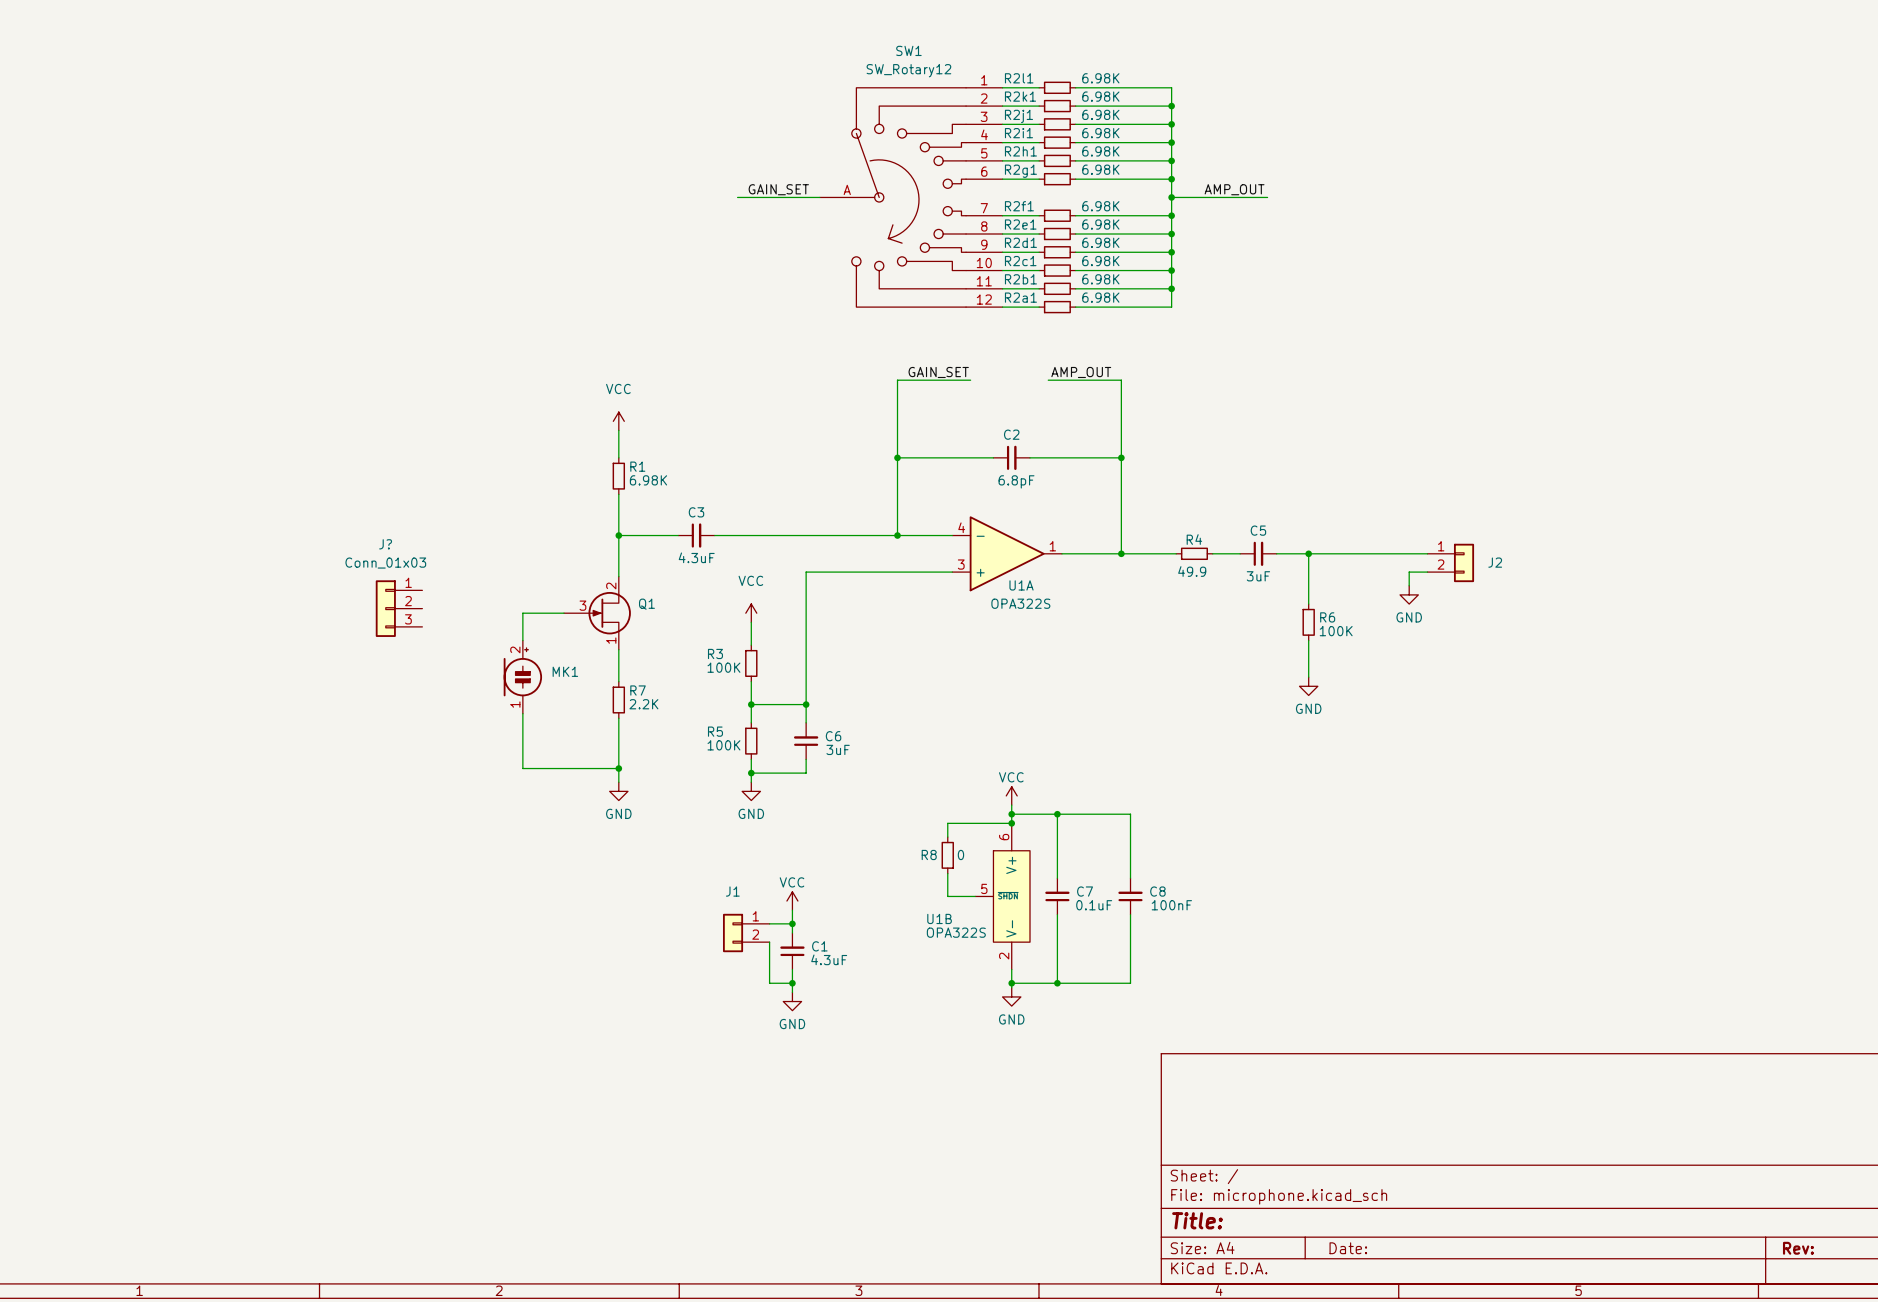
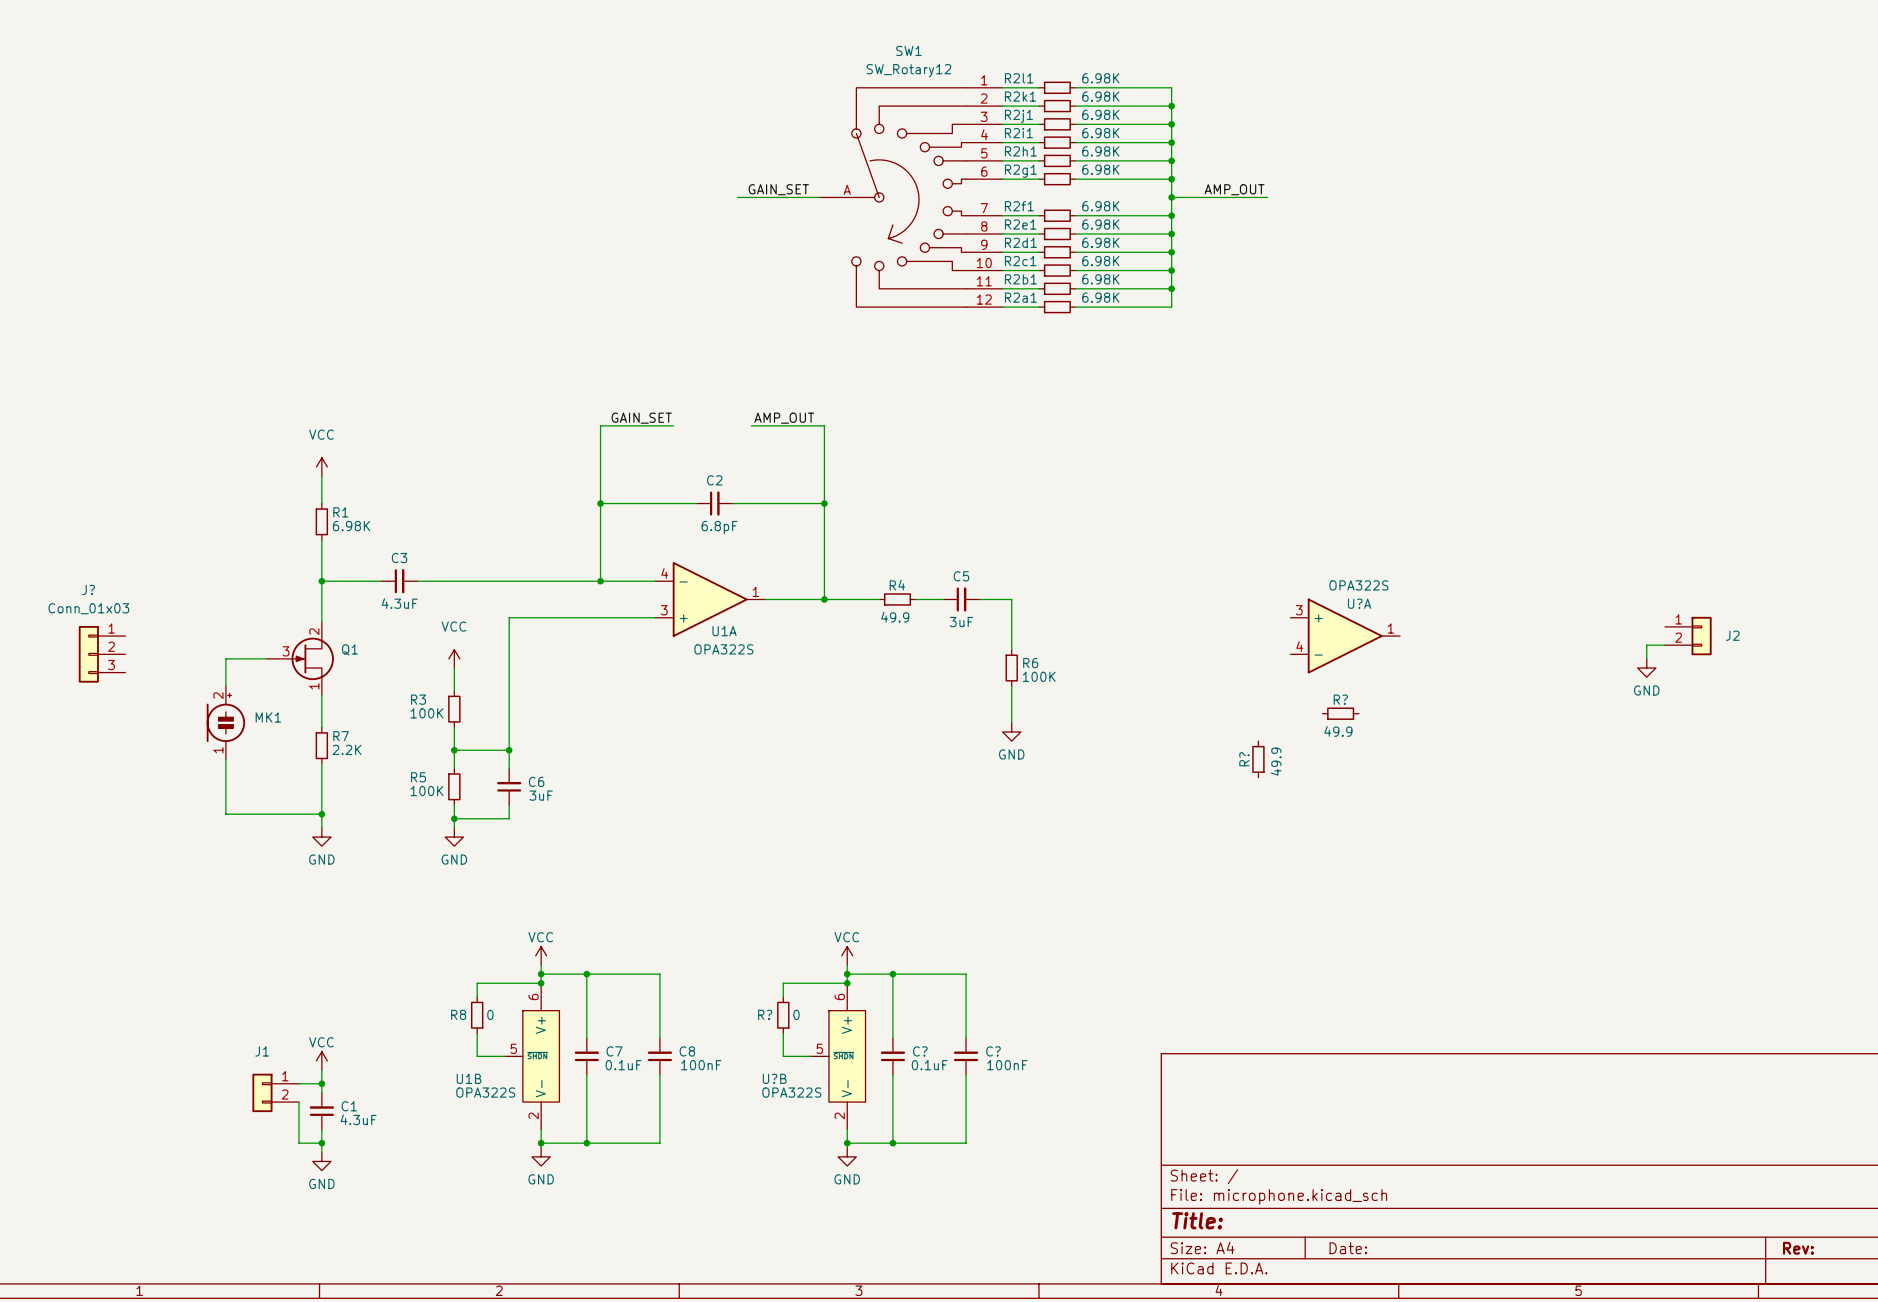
label: GAIN_SET (938, 372) -> none
label: AMP_OUT (1081, 372) -> none
wire: (970, 380) (897, 380) (897, 535) -> none
wire: (1048, 380) (1121, 380) (1121, 553) -> none
label: none -> GAIN_SET (641, 418)
label: none -> AMP_OUT (784, 418)
power symbol: VCC (618, 421) -> none
wire: none -> (673, 425) (600, 425) (600, 581)
wire: none -> (751, 425) (824, 425) (824, 599)
wire: (618, 430) (618, 457) -> none
wire: (897, 457) (993, 457) -> none
junction: (897, 457) -> none
C2 position: (1011, 457) -> (714, 503)
wire: (1029, 457) (1121, 457) -> none
junction: (1121, 457) -> none
power symbol: none -> VCC (321, 467)
wire: none -> (321, 476) (321, 503)
R1 position: (618, 476) -> (321, 521)
wire: (618, 494) (618, 576) -> none
wire: none -> (600, 503) (696, 503)
junction: none -> (600, 503)
wire: none -> (733, 503) (824, 503)
junction: none -> (824, 503)
wire: (618, 535) (678, 535) -> none
junction: (618, 535) -> none
C3 position: (696, 535) -> (399, 581)
wire: (714, 535) (952, 535) -> none
junction: (897, 535) -> none
wire: none -> (321, 540) (321, 622)
U1A position: (1007, 553) -> (710, 599)
wire: (1061, 553) (1176, 553) -> none
junction: (1121, 553) -> none
R4 position: (1194, 553) -> (897, 599)
wire: (1212, 553) (1240, 553) -> none
C5 position: (1258, 553) -> (961, 599)
wire: (1276, 553) (1427, 553) -> none
wire: (1308, 553) (1308, 604) -> none
junction: (1308, 553) -> none
J2 position: (1450, 562) -> (1688, 636)
wire: (952, 572) (806, 572) (806, 704) -> none
wire: (1427, 572) (1409, 572) (1409, 585) -> none
wire: none -> (321, 581) (381, 581)
junction: none -> (321, 581)
wire: none -> (417, 581) (655, 581)
junction: none -> (600, 581)
power symbol: GND (1409, 594) -> none
wire: none -> (765, 599) (879, 599)
junction: none -> (824, 599)
wire: none -> (915, 599) (943, 599)
wire: none -> (979, 599) (1011, 599) (1011, 649)
J?: Conn_01x03 (399, 608) -> none
wire: (563, 613) (522, 613) (522, 640) -> none
Q1 position: (597, 613) -> (300, 658)
power symbol: VCC (751, 613) -> none
wire: none -> (655, 617) (509, 617) (509, 768)
wire: (751, 622) (751, 645) -> none
R6 position: (1308, 622) -> (1011, 668)
U?A: none -> OPA322S (1345, 636)
wire: none -> (1665, 645) (1646, 645) (1646, 658)
wire: (618, 649) (618, 681) -> none
J?: none -> Conn_01x03 (102, 654)
wire: none -> (267, 658) (225, 658) (225, 686)
power symbol: none -> VCC (454, 658)
R3 position: (751, 663) -> (454, 709)
wire: none -> (454, 668) (454, 690)
power symbol: none -> GND (1646, 668)
MK1 position: (522, 677) -> (225, 722)
wire: (751, 681) (751, 704) -> none
wire: none -> (1011, 686) (1011, 722)
power symbol: GND (1308, 686) -> none
wire: none -> (321, 695) (321, 727)
R7 position: (618, 700) -> (321, 745)
wire: (751, 704) (751, 722) -> none
wire: (751, 704) (806, 704) -> none
junction: (751, 704) -> none
wire: (806, 704) (806, 722) -> none
junction: (806, 704) -> none
wire: (522, 713) (522, 768) (618, 768) -> none
R?: none -> 49.9 (1340, 713)
wire: (618, 718) (618, 782) -> none
wire: none -> (454, 727) (454, 768)
power symbol: none -> GND (1011, 731)
R5 position: (751, 741) -> (454, 786)
C6 position: (806, 741) -> (509, 786)
wire: none -> (454, 750) (509, 750)
junction: none -> (454, 750)
junction: none -> (509, 750)
wire: none -> (225, 759) (225, 814) (321, 814)
wire: (751, 759) (751, 782) -> none
wire: (806, 759) (806, 773) (751, 773) -> none
R?: none -> 49.9 (1258, 759)
wire: none -> (321, 763) (321, 827)
junction: (618, 768) -> none
junction: (751, 773) -> none
power symbol: GND (618, 791) -> none
power symbol: GND (751, 791) -> none
power symbol: VCC (1011, 795) -> none
wire: none -> (454, 805) (454, 827)
wire: none -> (509, 805) (509, 818) (454, 818)
wire: (1011, 805) (1011, 823) (947, 823) (947, 837) -> none
junction: none -> (321, 814)
wire: (1011, 814) (1130, 814) (1130, 878) -> none
junction: (1011, 814) -> none
wire: (1057, 814) (1057, 878) -> none
junction: (1057, 814) -> none
junction: none -> (454, 818)
junction: (1011, 823) -> none
power symbol: none -> GND (321, 837)
power symbol: none -> GND (454, 837)
R8 position: (947, 855) -> (477, 1015)
wire: (947, 873) (947, 896) (975, 896) -> none
U1B position: (1002, 896) -> (532, 1056)
C7 position: (1057, 896) -> (586, 1056)
C8 position: (1130, 896) -> (659, 1056)
power symbol position: VCC (792, 901) -> VCC (847, 955)
wire: (792, 910) (792, 933) -> none
wire: (1057, 914) (1057, 983) -> none
wire: (1130, 914) (1130, 983) (1011, 983) -> none
wire: (769, 923) (792, 923) -> none
junction: (792, 923) -> none
J1 position: (746, 933) -> (275, 1092)
wire: (769, 942) (769, 983) (783, 983) -> (783, 996) (783, 983)
C1 position: (792, 951) -> (321, 1111)
power symbol: none -> VCC (541, 955)
wire: none -> (541, 964) (541, 983) (477, 983) (477, 996)
wire: none -> (847, 964) (847, 983) (792, 983)
wire: (792, 969) (792, 992) -> none
wire: (1011, 969) (1011, 987) -> none
wire: none -> (541, 974) (659, 974) (659, 1038)
junction: none -> (541, 974)
wire: none -> (586, 974) (586, 1038)
junction: none -> (586, 974)
wire: none -> (847, 974) (966, 974) (966, 1038)
junction: none -> (847, 974)
wire: none -> (892, 974) (892, 1038)
junction: none -> (892, 974)
junction: none -> (541, 983)
junction: (792, 983) -> none
junction: none -> (847, 983)
junction: (1011, 983) -> none
junction: (1057, 983) -> none
power symbol: GND (1011, 996) -> none
power symbol: GND (792, 1001) -> none
R?: none -> 0 (783, 1015)
wire: none -> (477, 1033) (477, 1056) (504, 1056)
wire: none -> (783, 1033) (783, 1056) (810, 1056)
U?B: none -> OPA322S (838, 1056)
C?: none -> 0.1uF (892, 1056)
C?: none -> 100nF (966, 1056)
power symbol: none -> VCC (321, 1060)
wire: none -> (321, 1070) (321, 1092)
wire: none -> (586, 1074) (586, 1143)
wire: none -> (659, 1074) (659, 1143) (541, 1143)
wire: none -> (892, 1074) (892, 1143)
wire: none -> (966, 1074) (966, 1143) (847, 1143)
wire: none -> (299, 1083) (321, 1083)
junction: none -> (321, 1083)
wire: none -> (299, 1102) (299, 1143) (321, 1143)
wire: none -> (321, 1129) (321, 1152)
wire: none -> (541, 1129) (541, 1147)
wire: none -> (847, 1129) (847, 1147)
junction: none -> (321, 1143)
junction: none -> (541, 1143)
junction: none -> (586, 1143)
junction: none -> (847, 1143)
junction: none -> (892, 1143)
power symbol: none -> GND (541, 1156)
power symbol: none -> GND (847, 1156)
power symbol: none -> GND (321, 1161)

